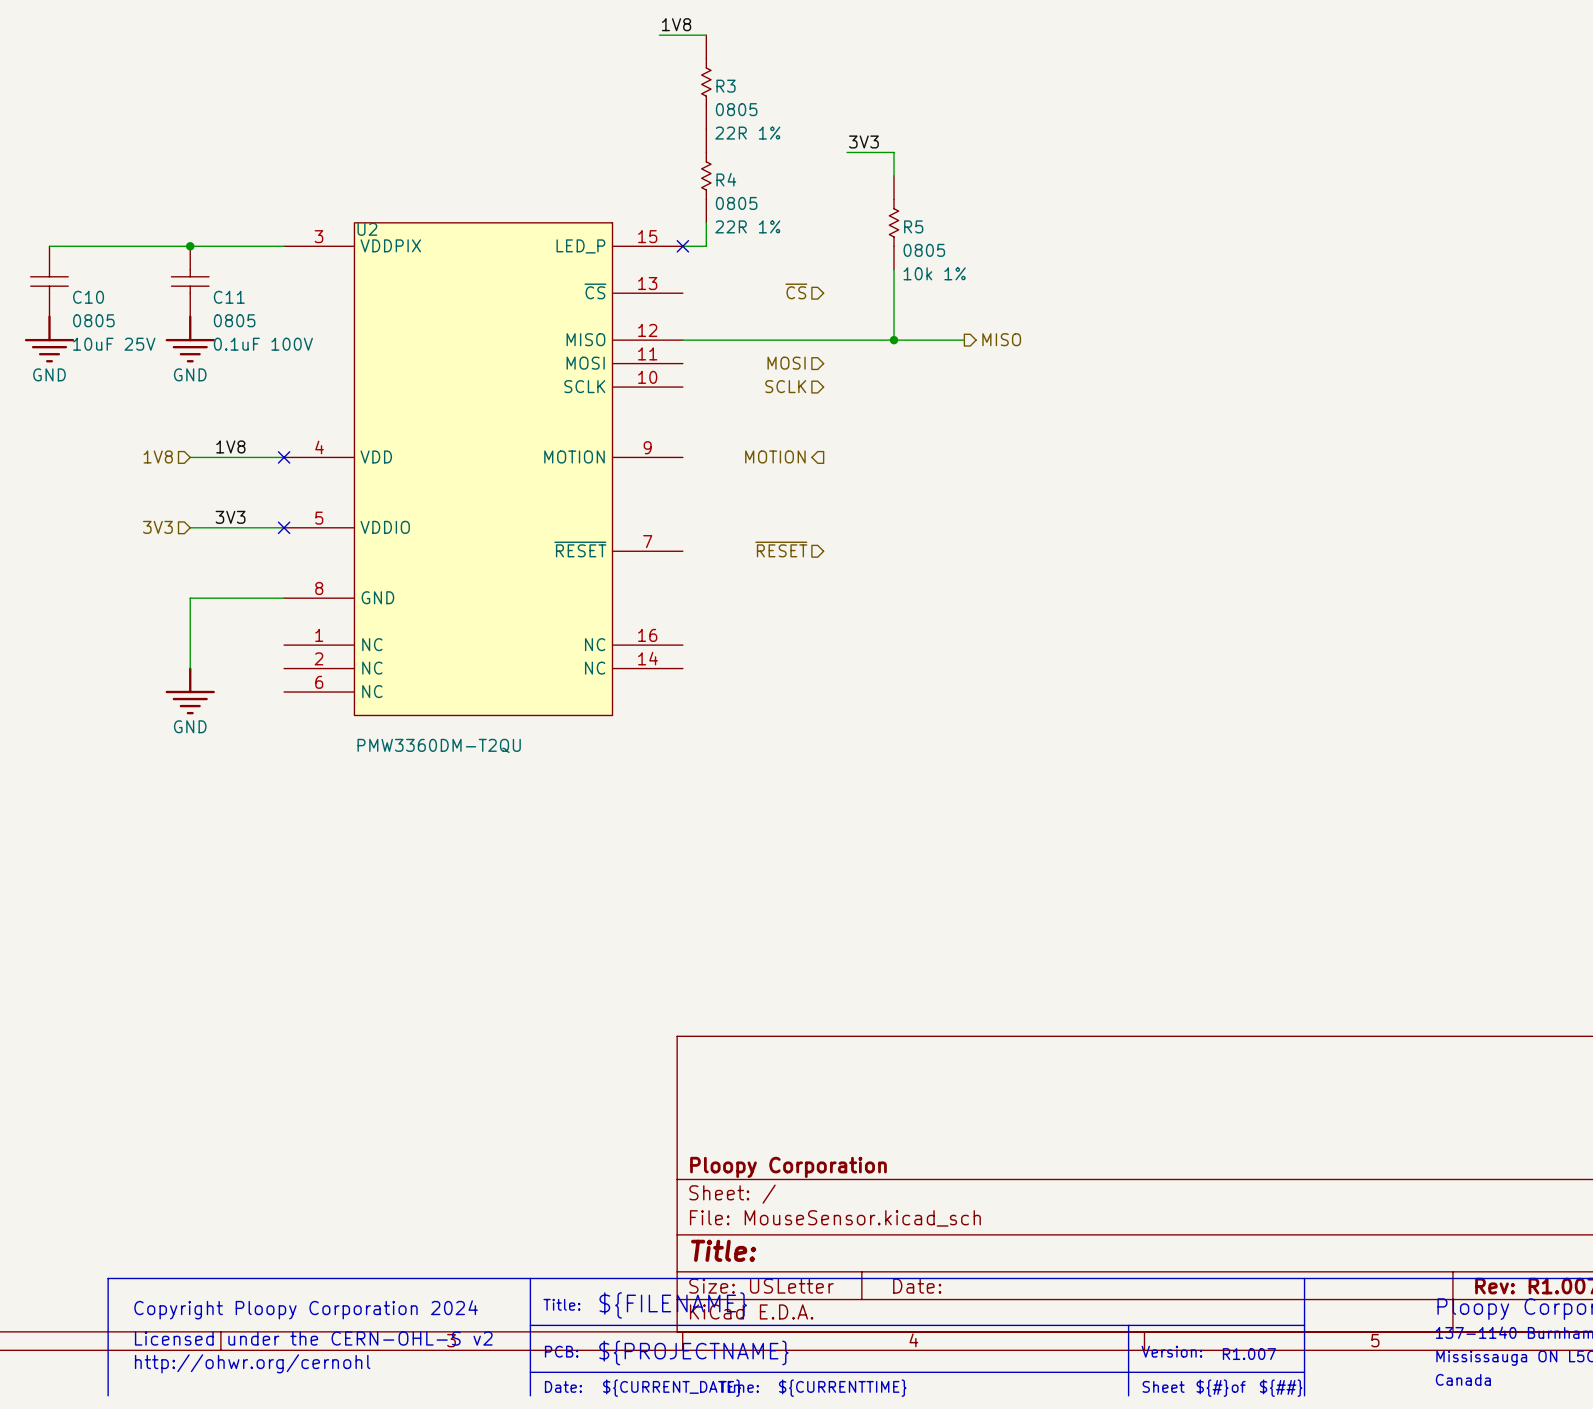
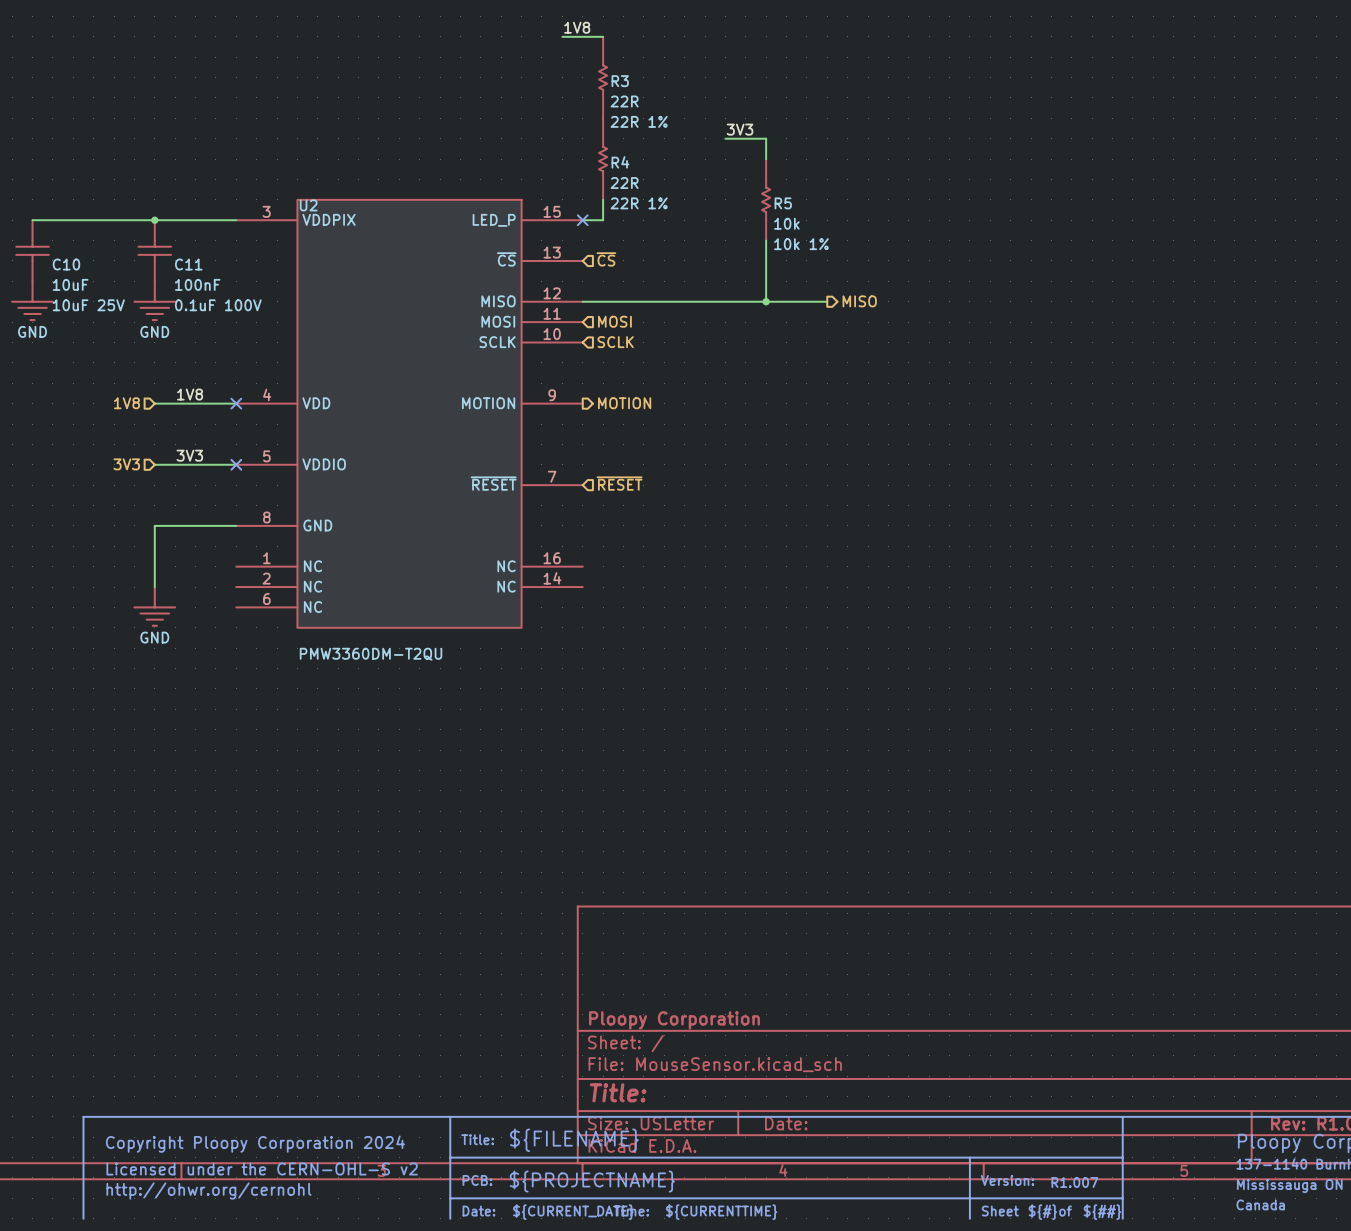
R3 value: 0805 (736, 109) -> 22R (624, 101)
R4 value: 0805 (736, 203) -> 22R (624, 183)
R5 value: 0805 (924, 250) -> 10k (786, 223)
hierarchical label rotation: 0° (796, 291) -> 180° (606, 259)
C10 value: 0805 (93, 320) -> 10uF (70, 284)
C11 value: 0805 (234, 320) -> 100nF (197, 284)
hierarchical label rotation: 0° (786, 363) -> 180° (614, 321)
hierarchical label rotation: 0° (785, 386) -> 180° (615, 342)
hierarchical label position: SCLK (785, 386) -> SCLK (615, 342)
hierarchical label rotation: 0° (775, 456) -> 180° (624, 403)
hierarchical label rotation: 0° (781, 549) -> 180° (619, 483)

